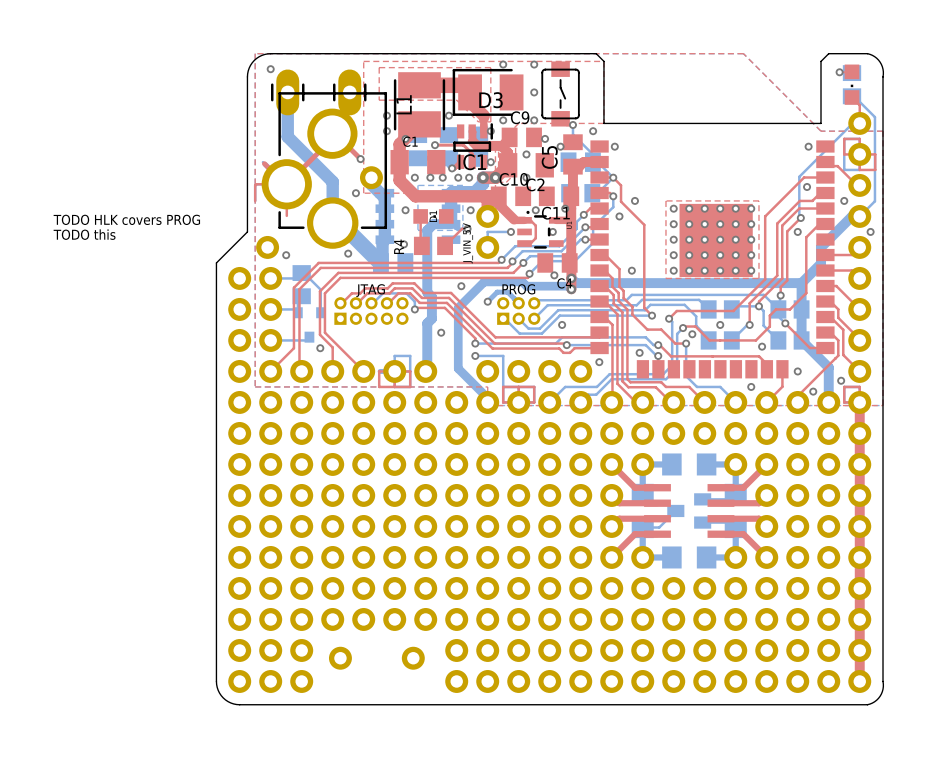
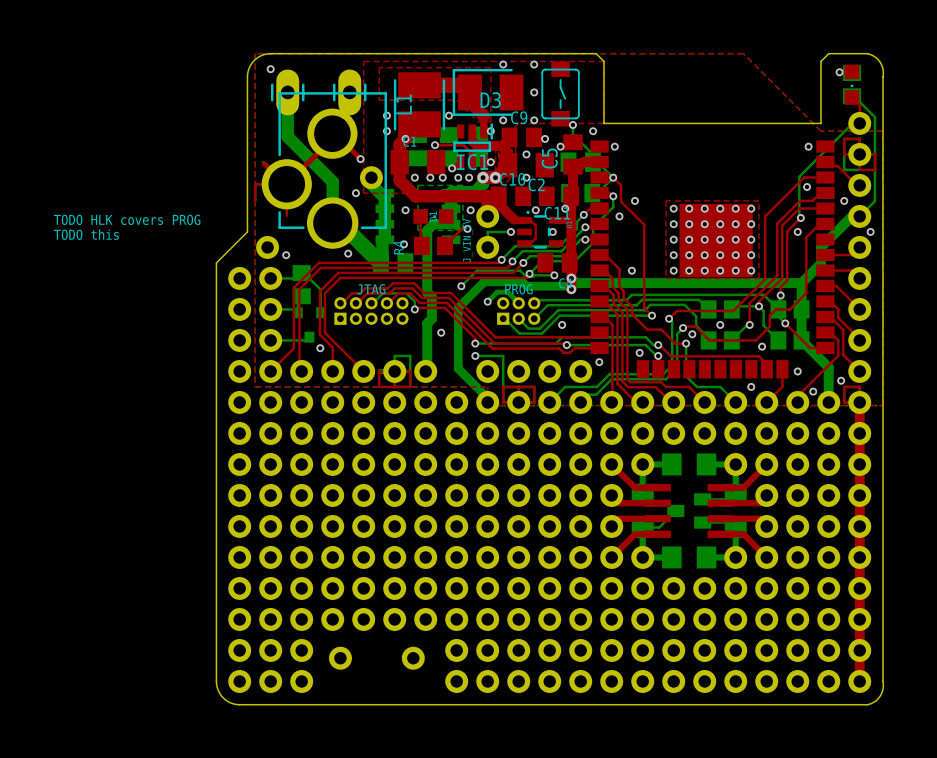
bottom track: none -> (554, 275) (526, 276) (520, 270) (476, 270) (461, 286)

